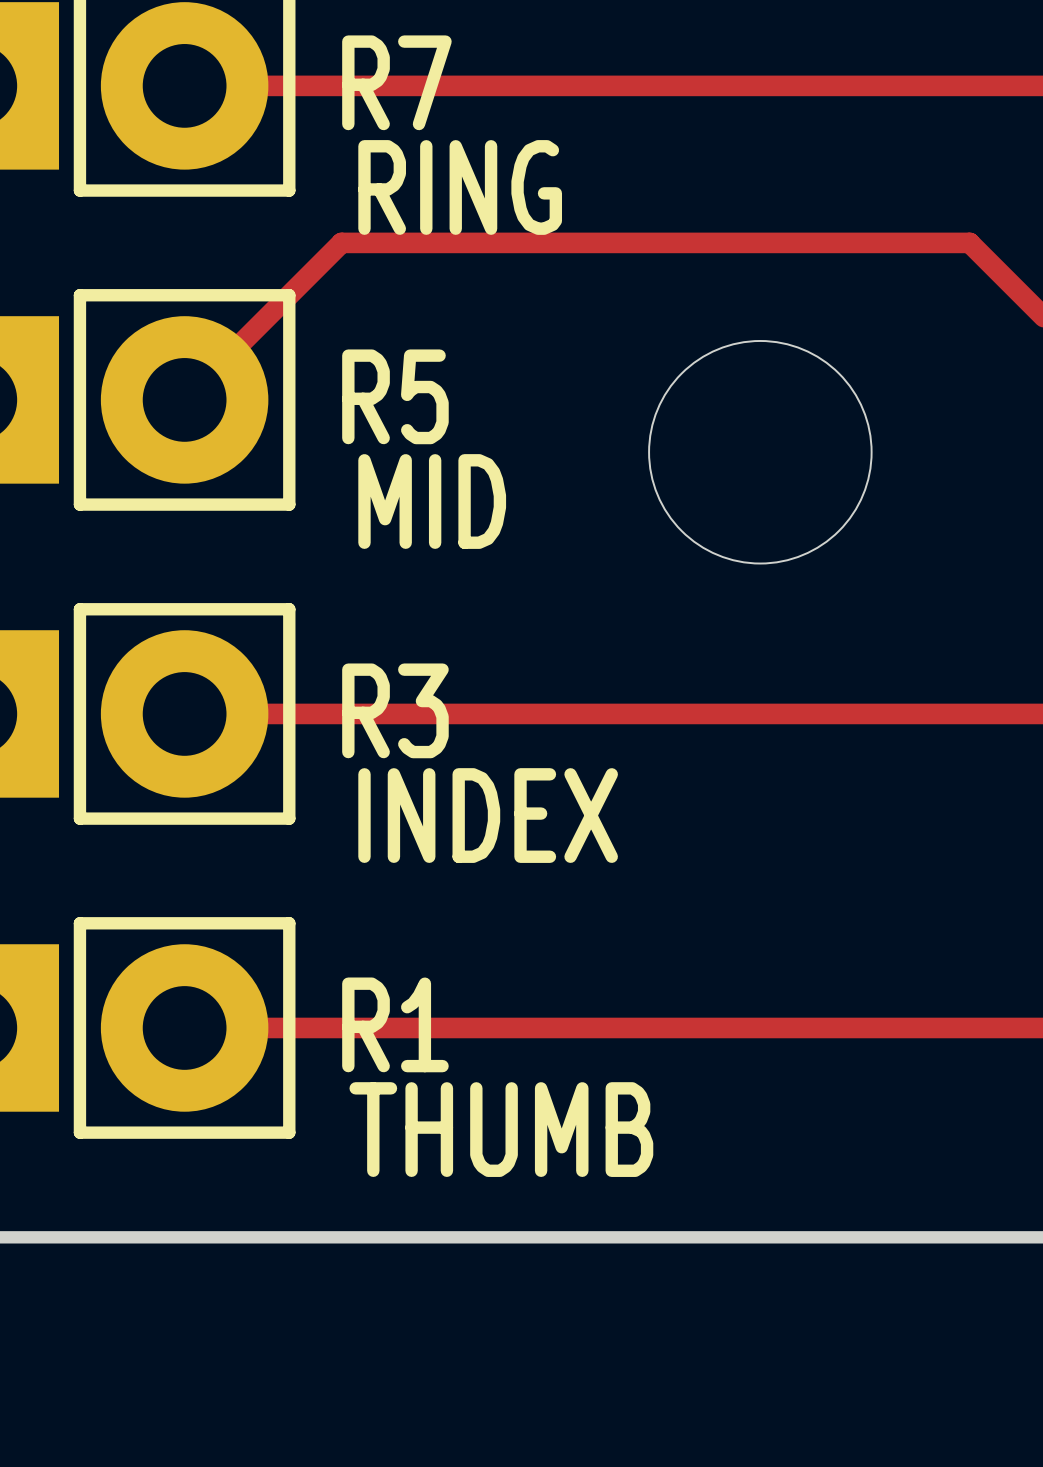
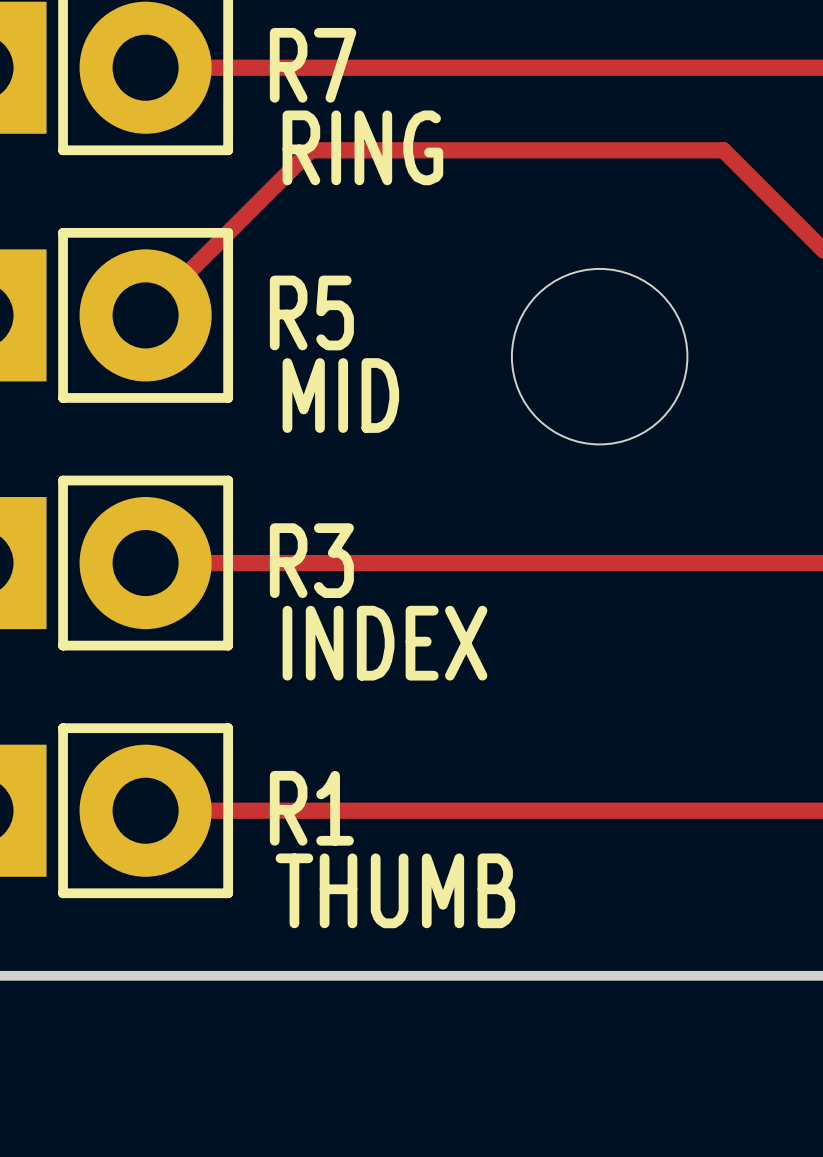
track: (341, 242) (969, 242) -> (269, 191) (310, 150) (723, 150) (764, 191)

